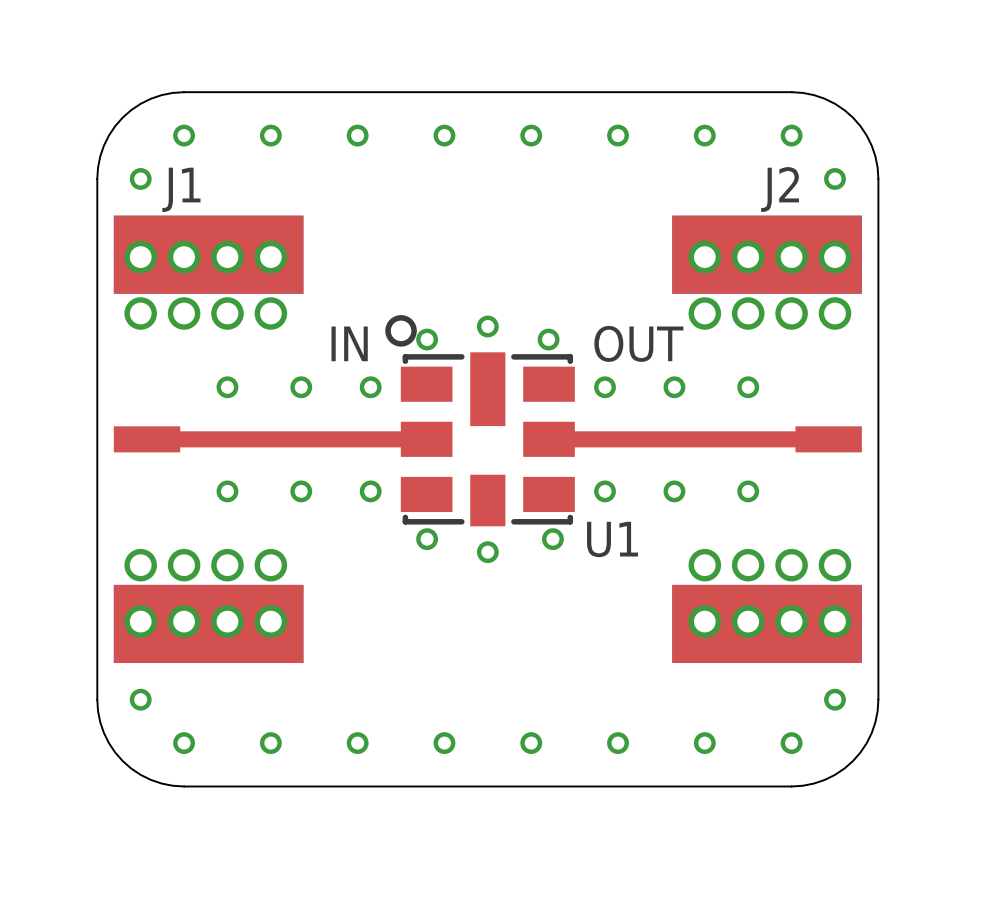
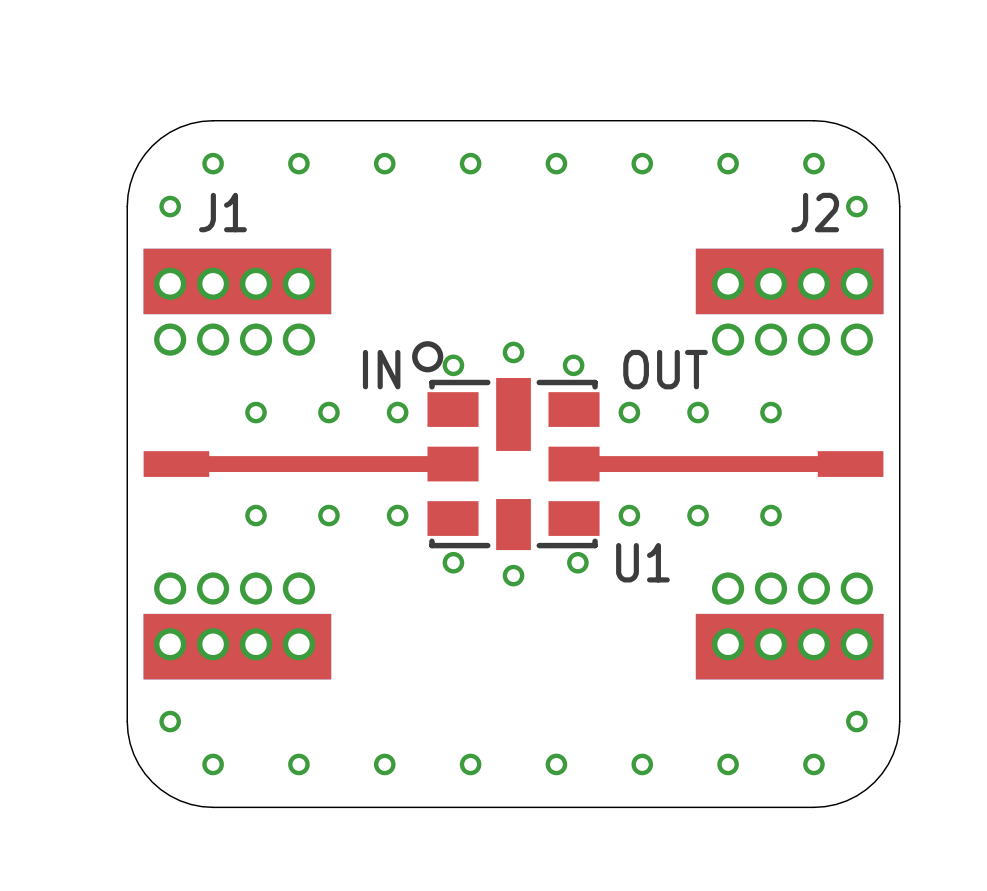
J1 footprint: [113, 215, 304, 664] -> [143, 248, 332, 680]
J2 footprint: [672, 215, 862, 664] -> [695, 248, 884, 680]

